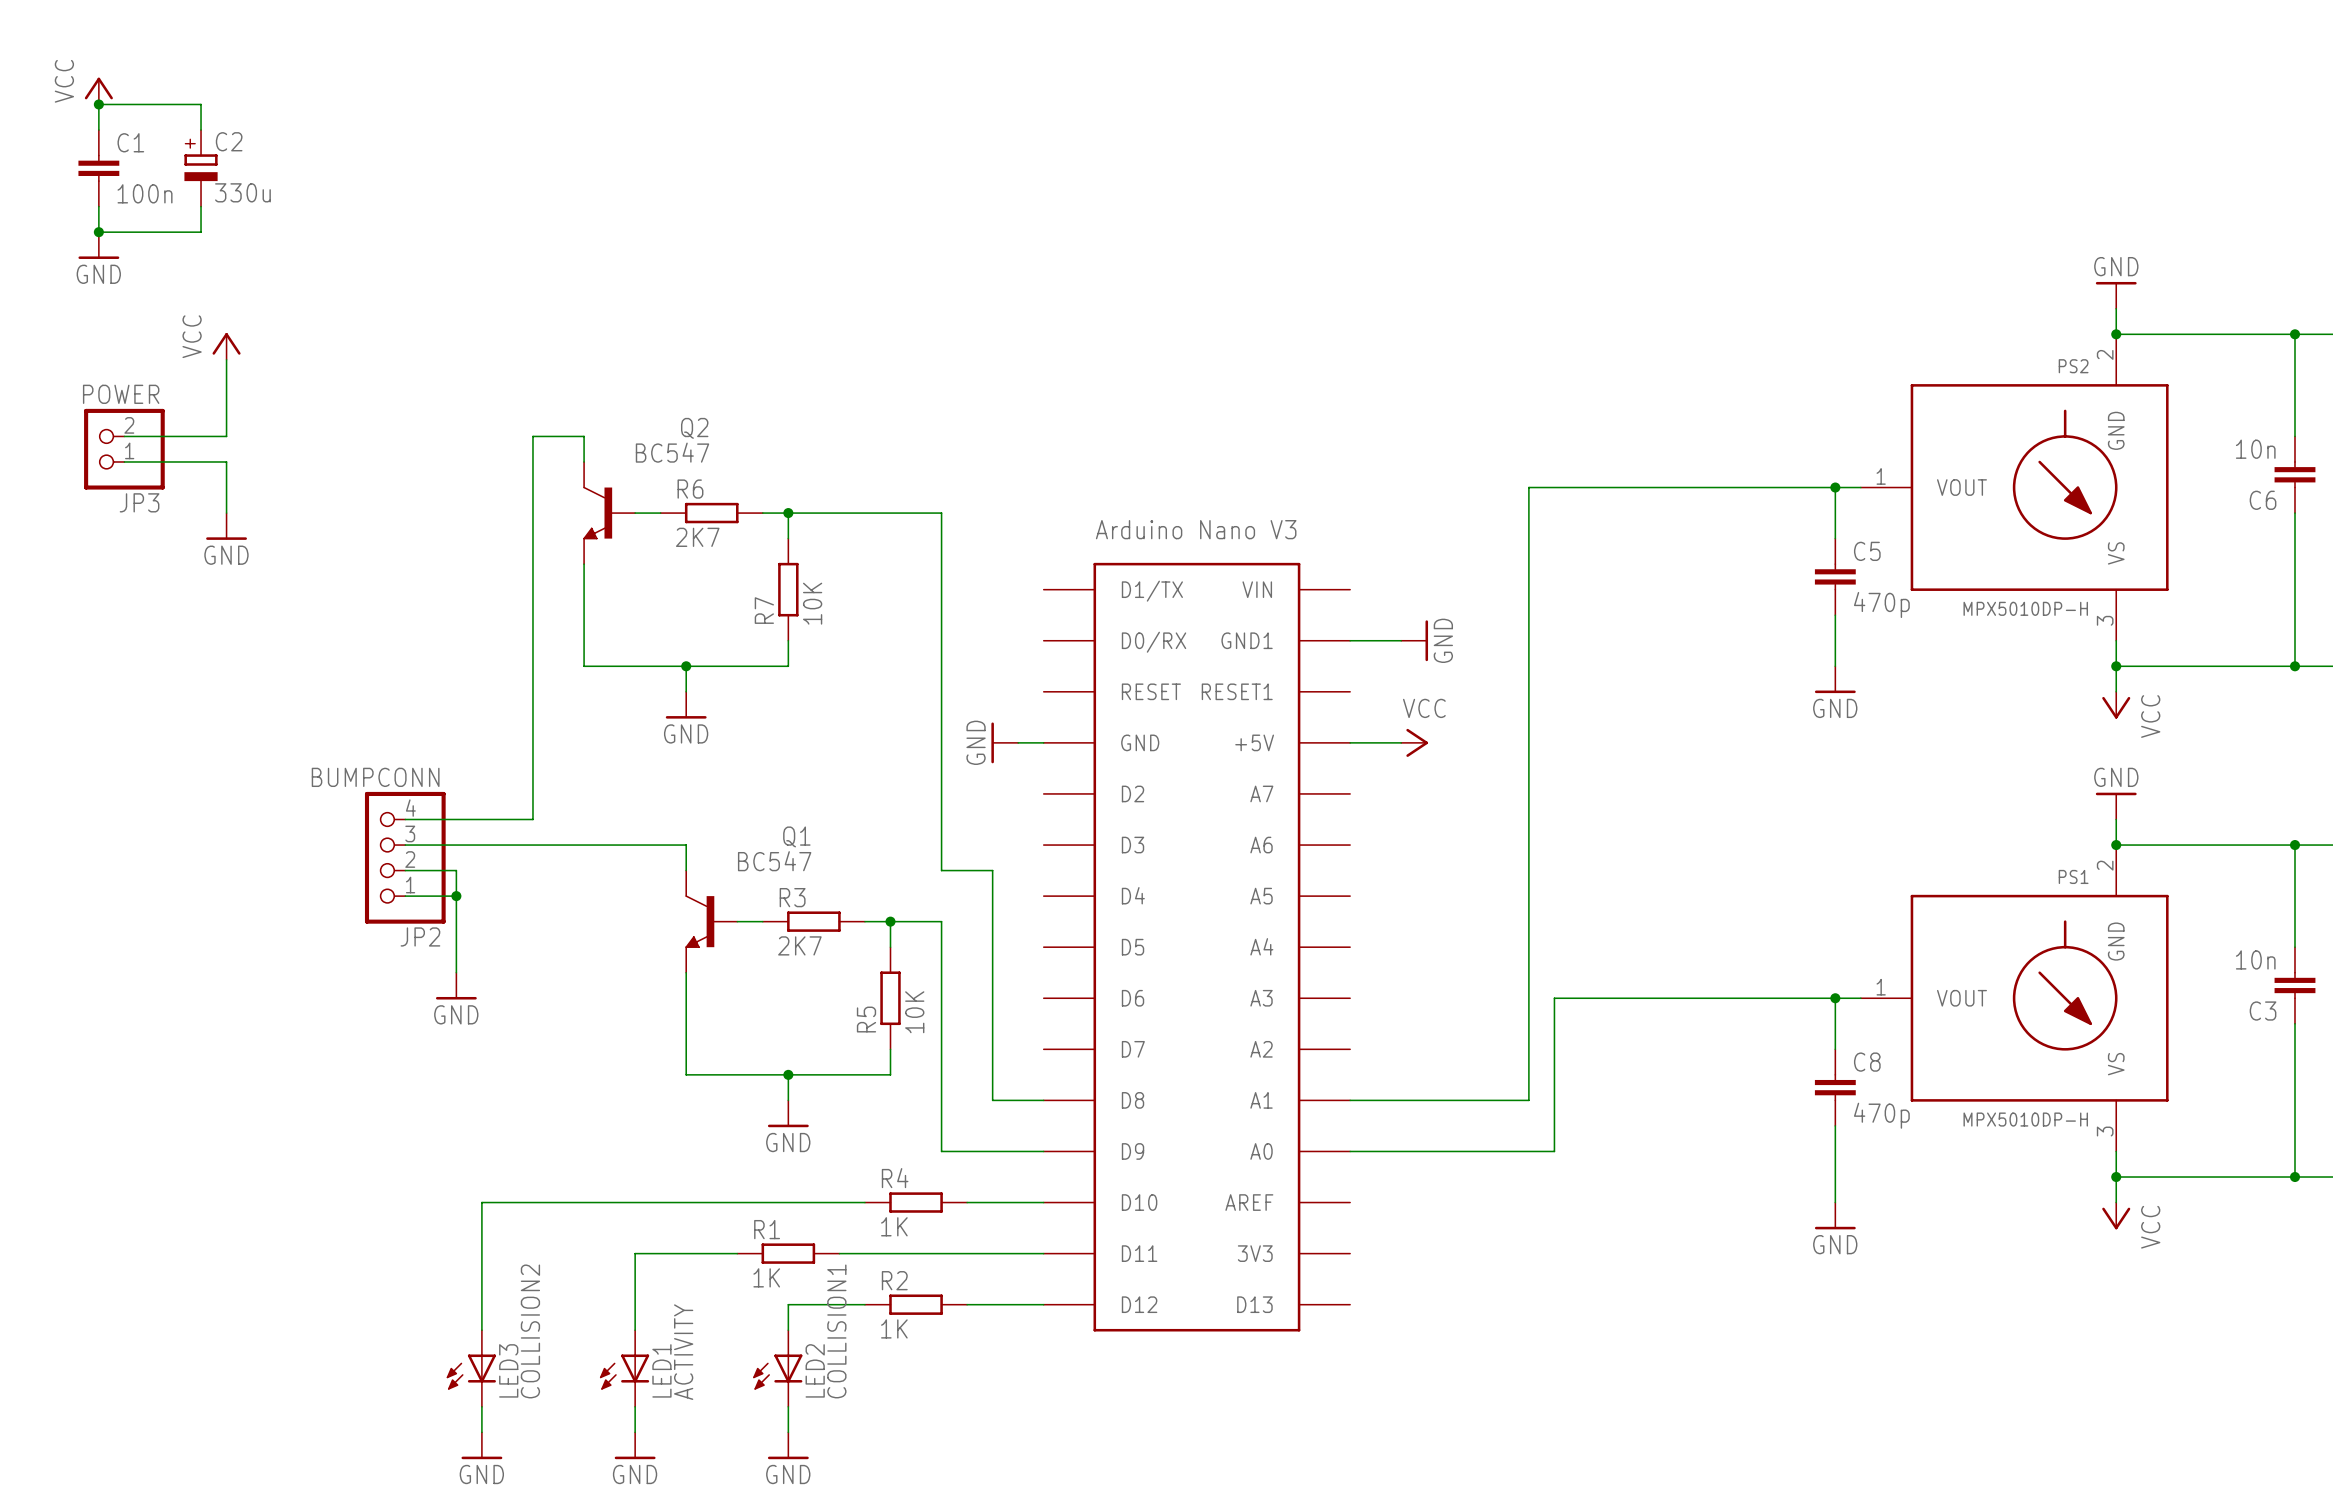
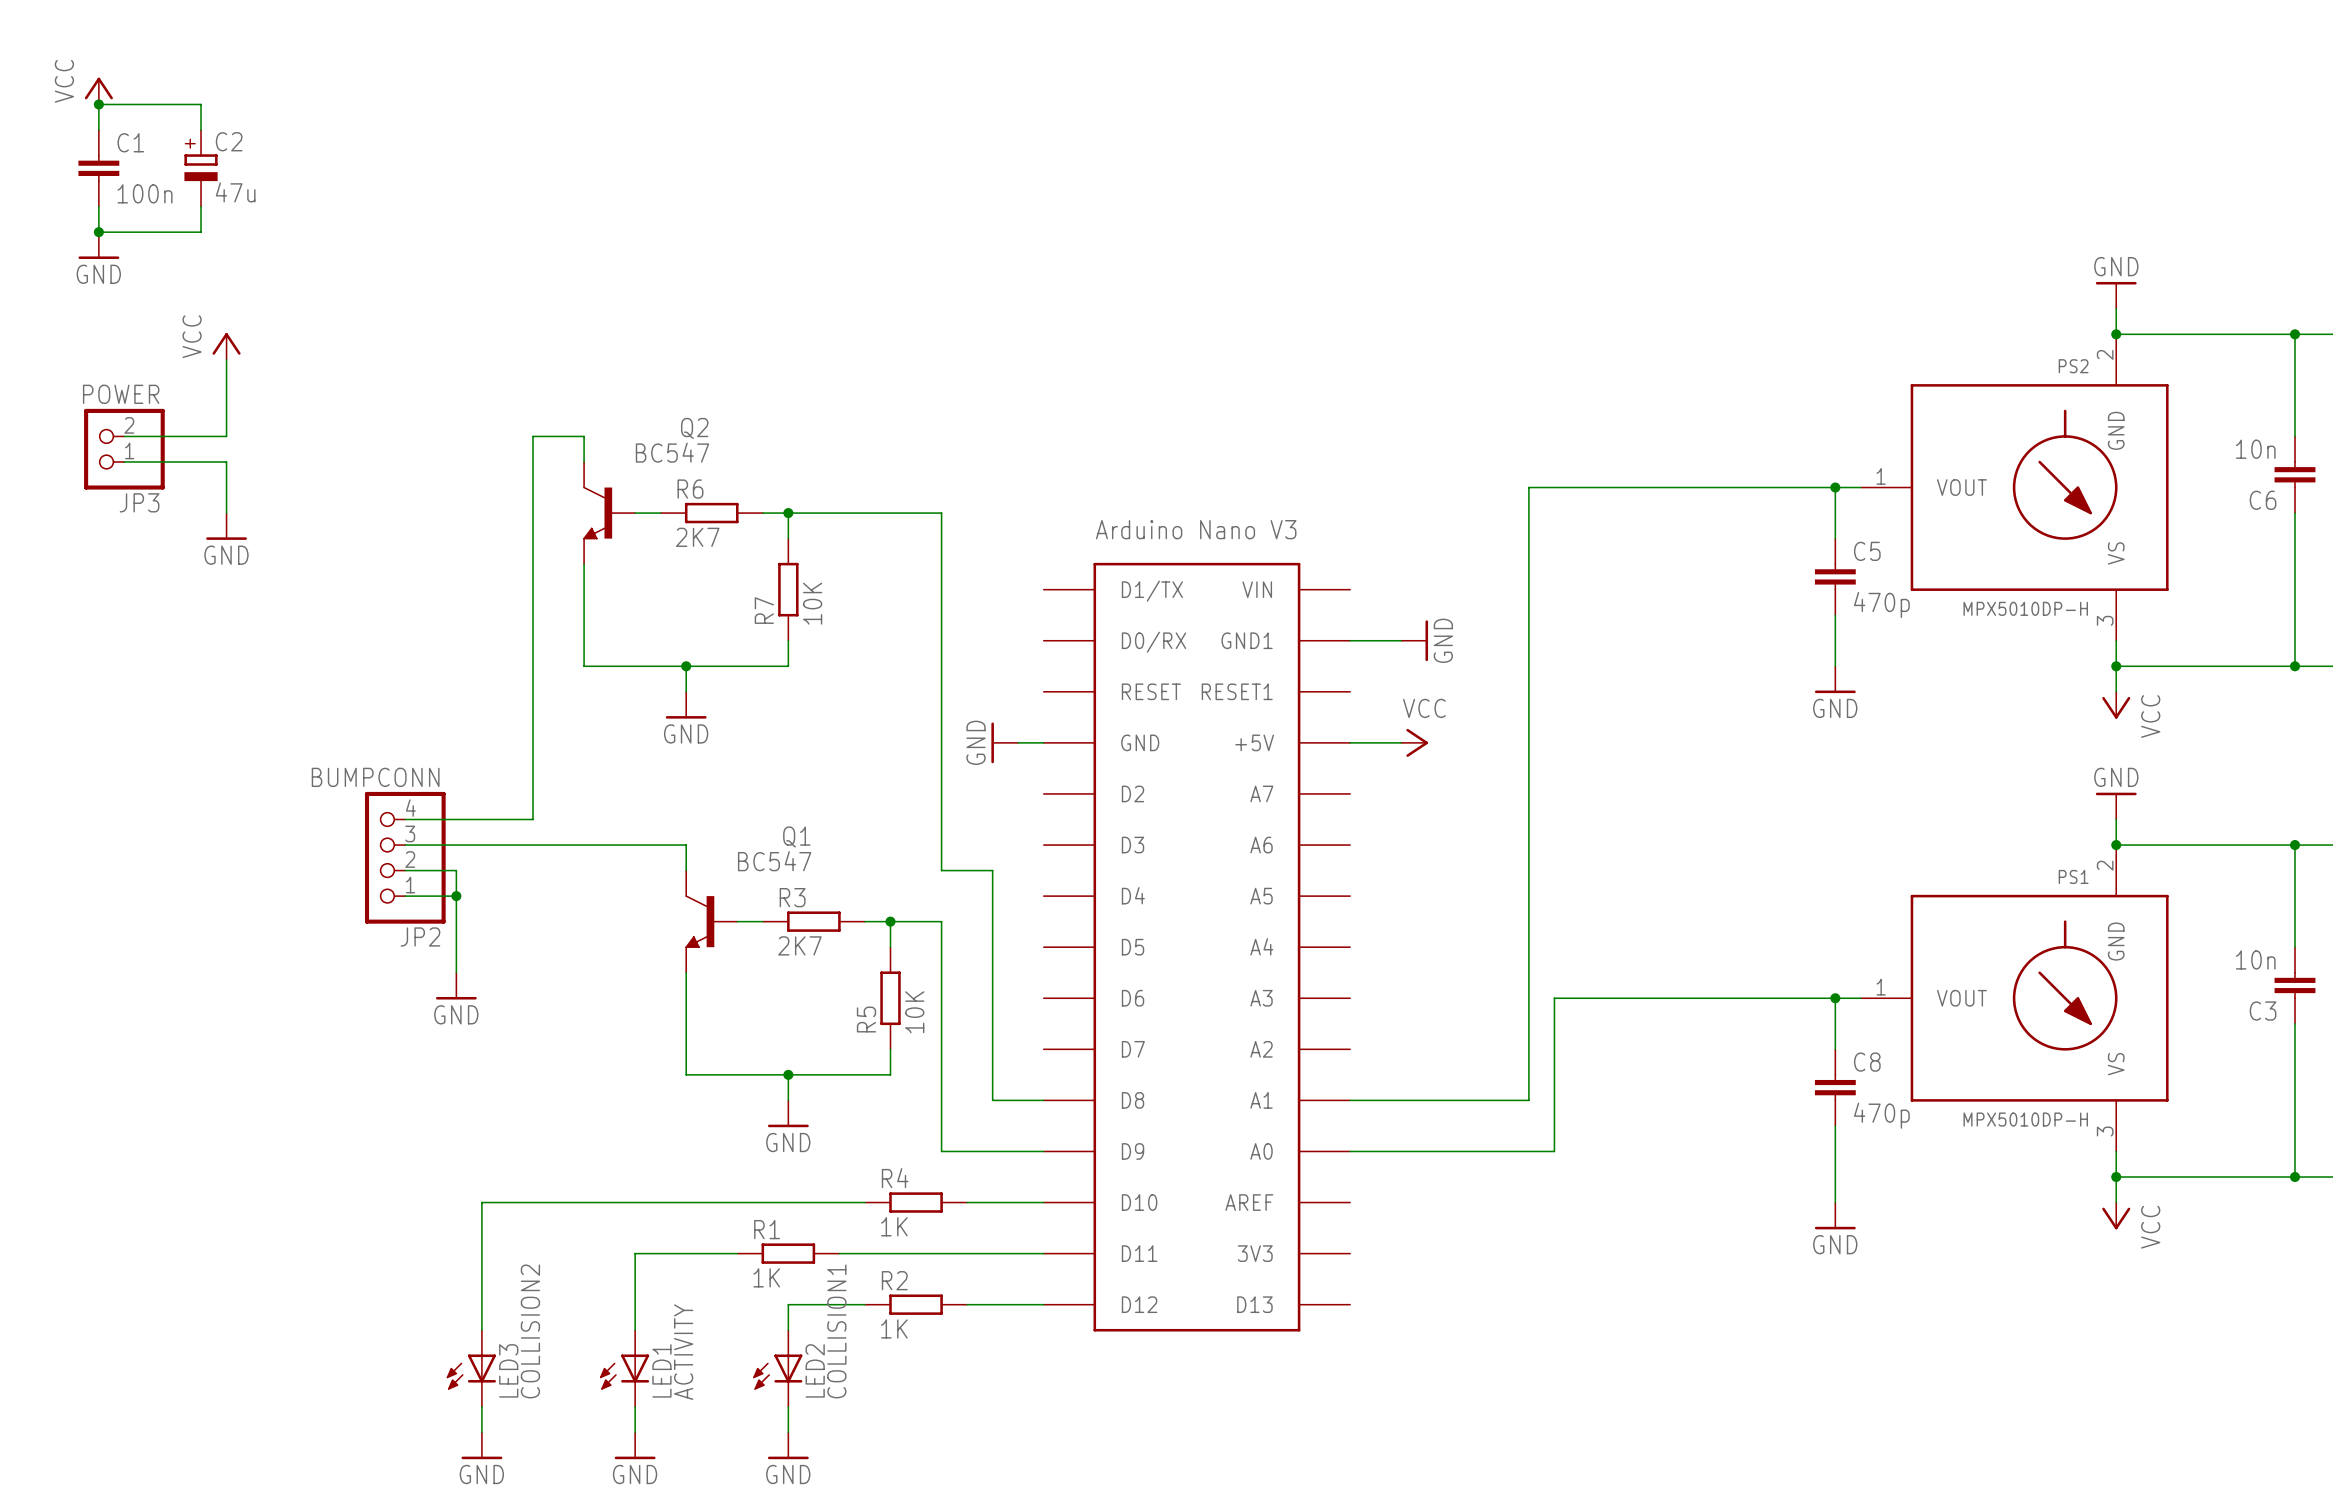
C2 value: 330u (242, 192) -> 47u (235, 192)

